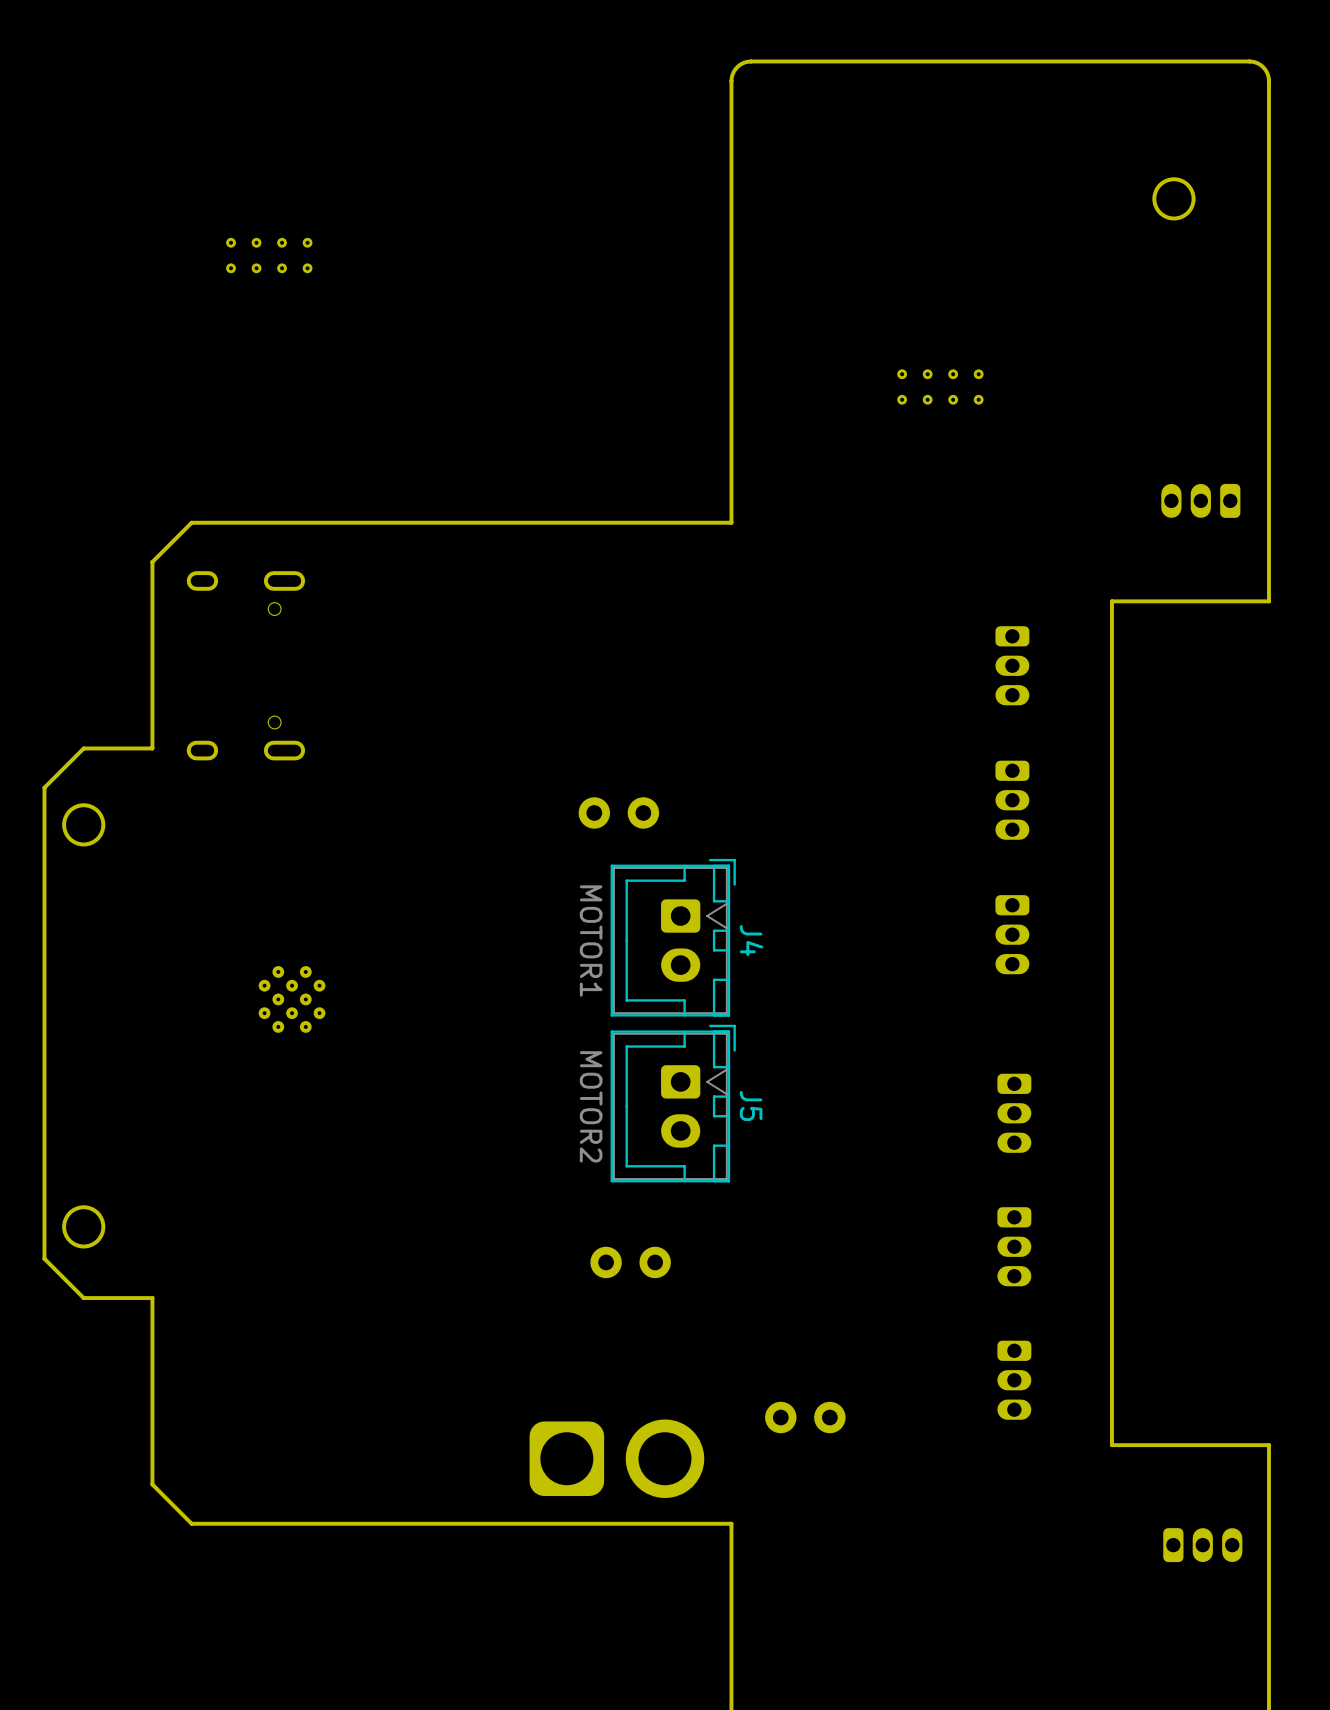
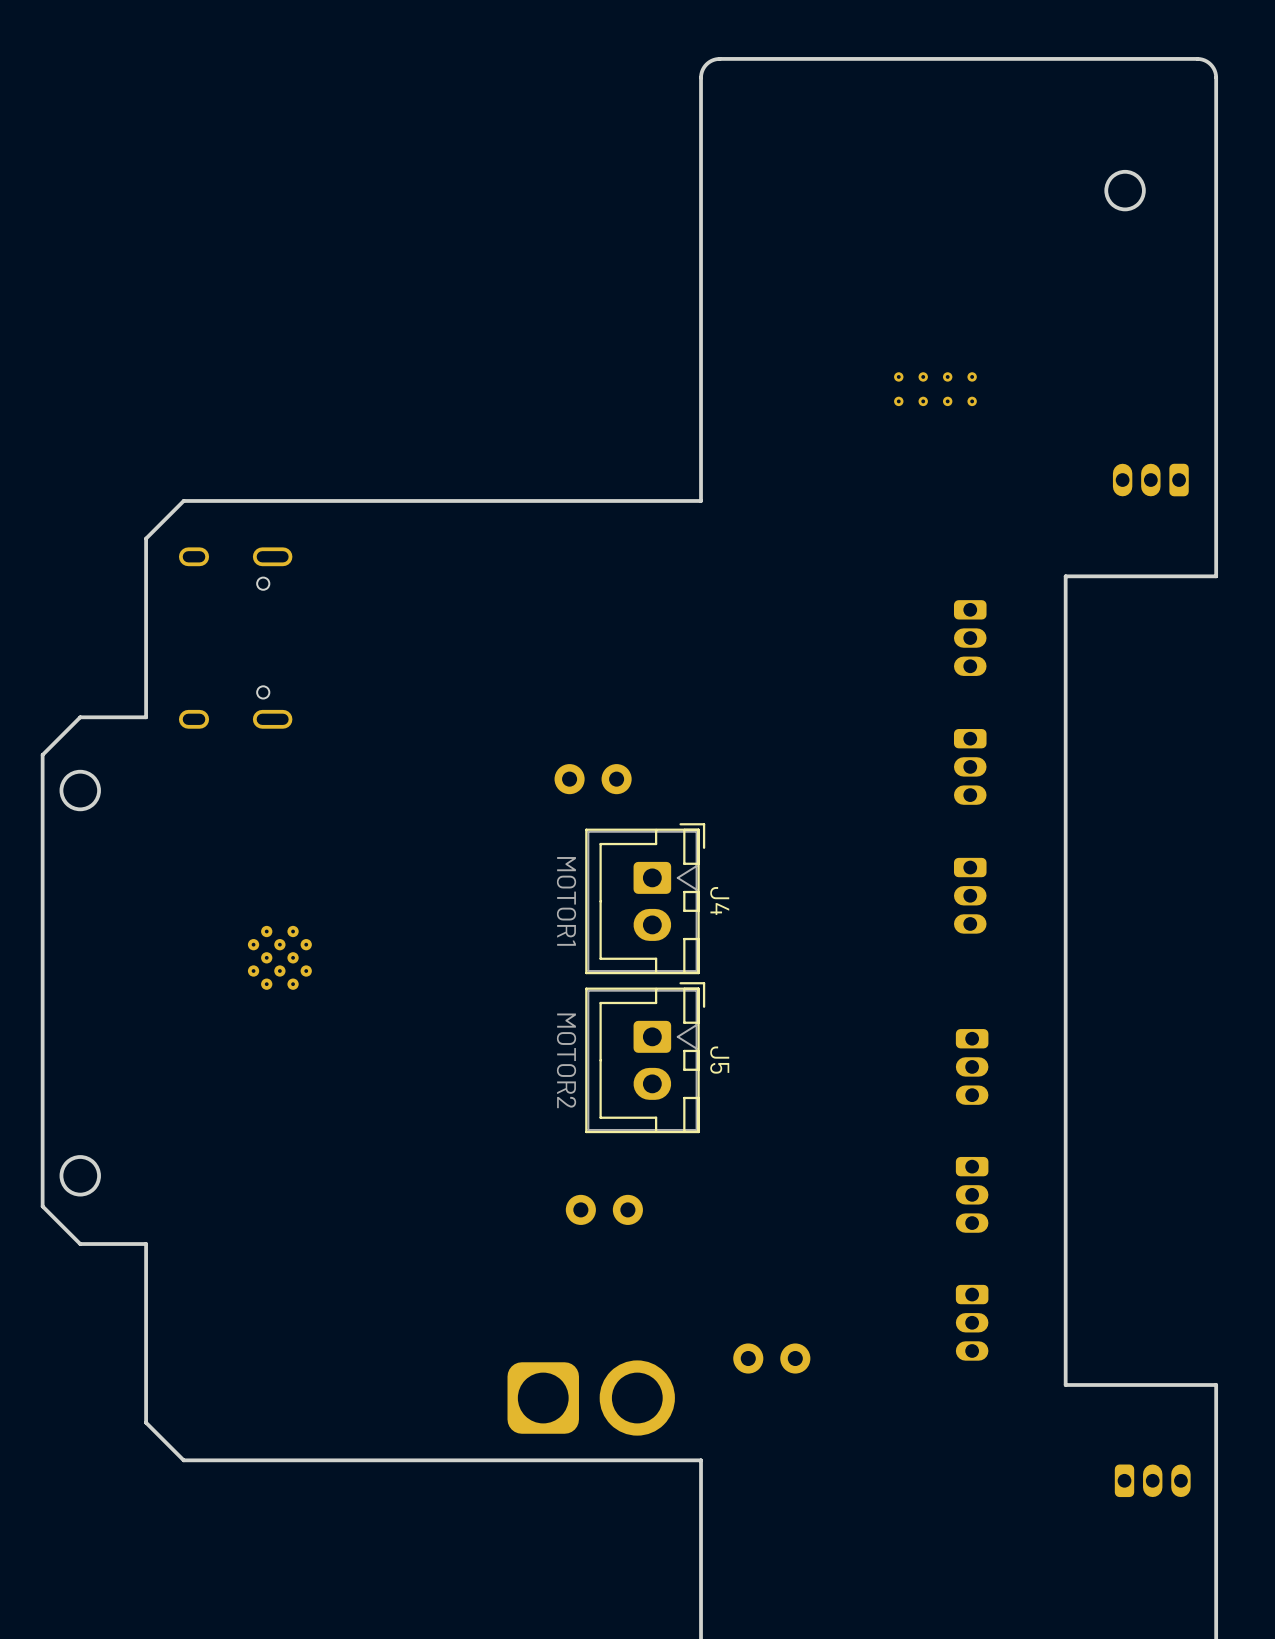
part: (269, 255) -> none
part position: (940, 387) -> (935, 389)

